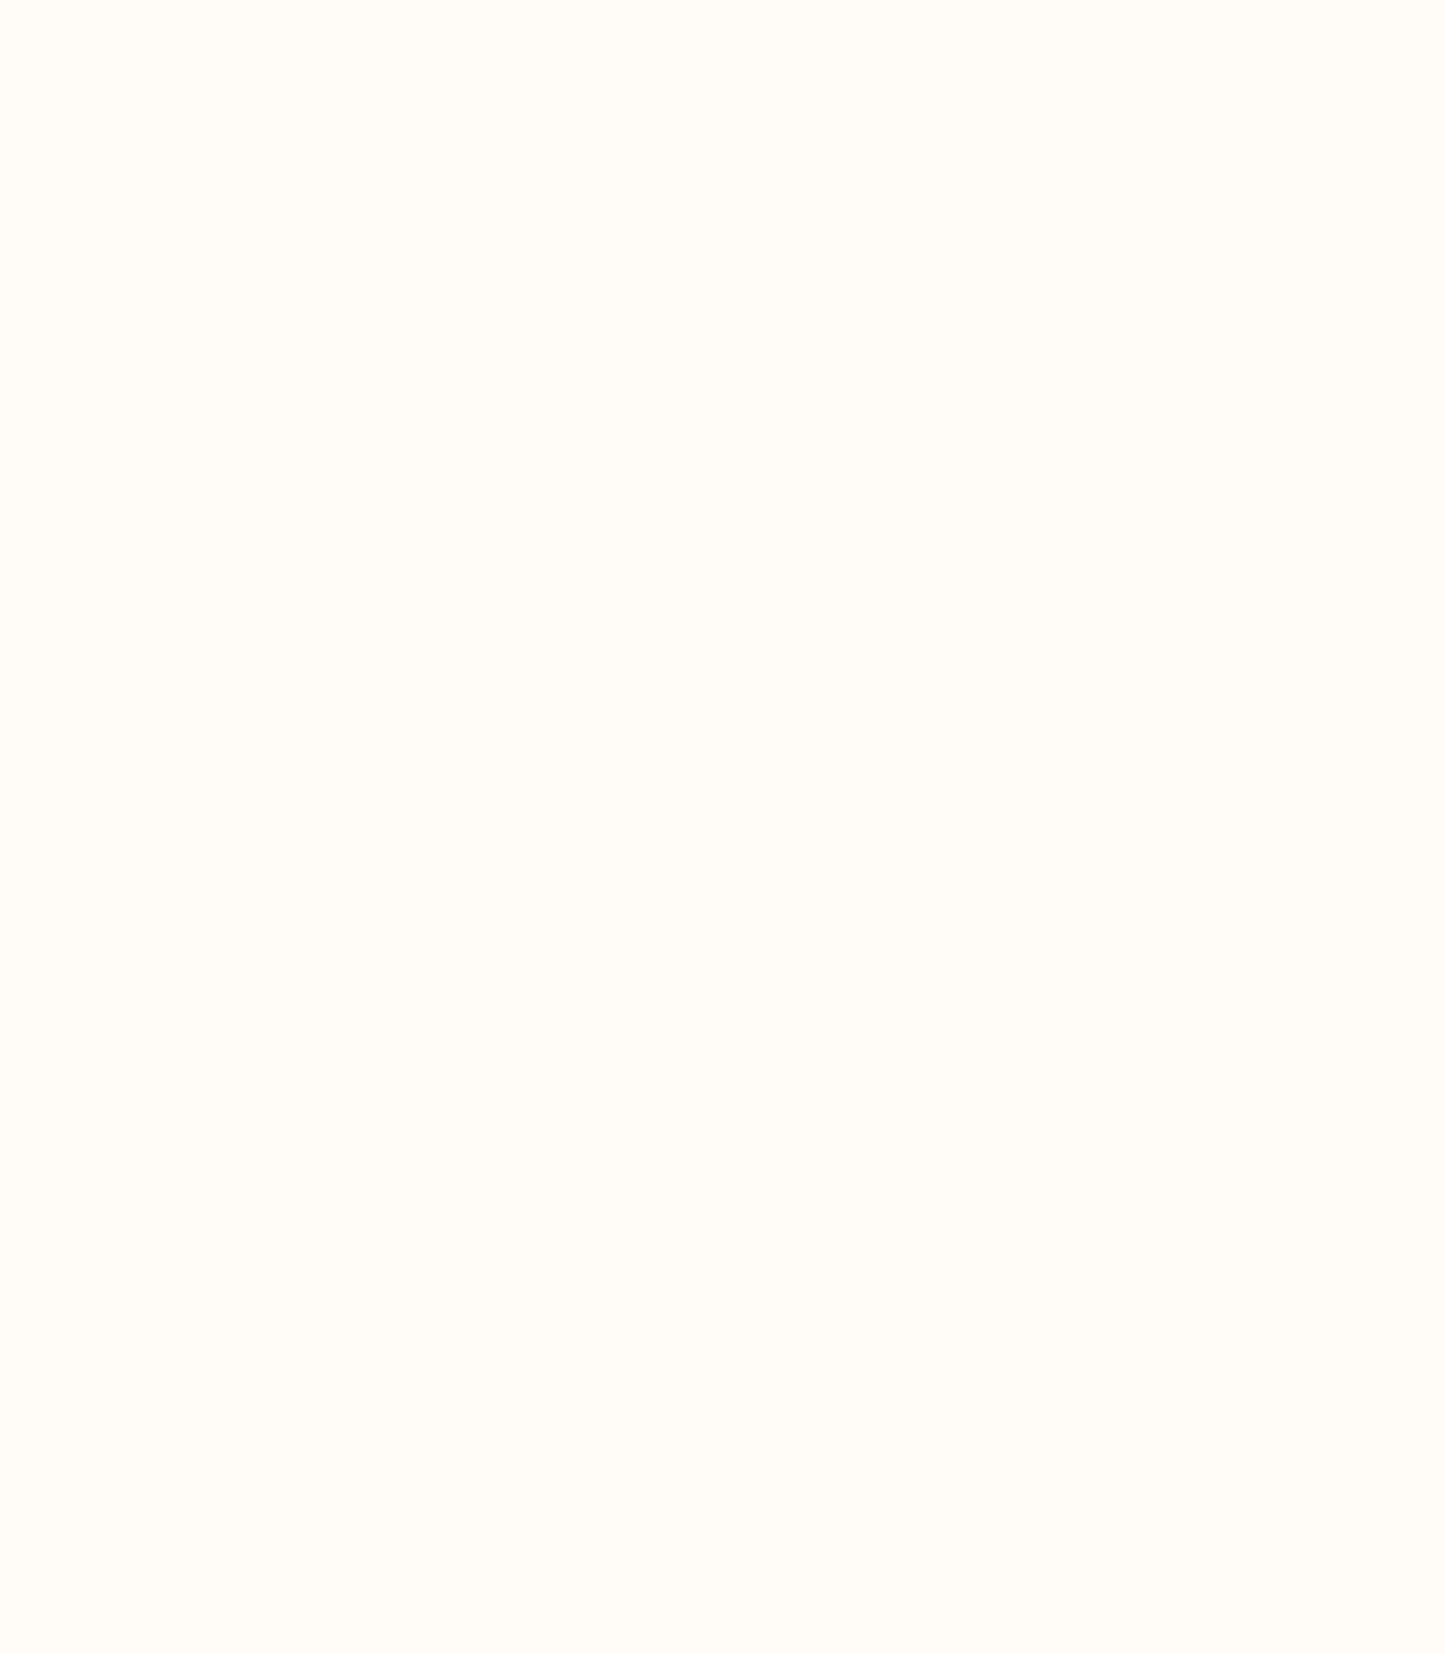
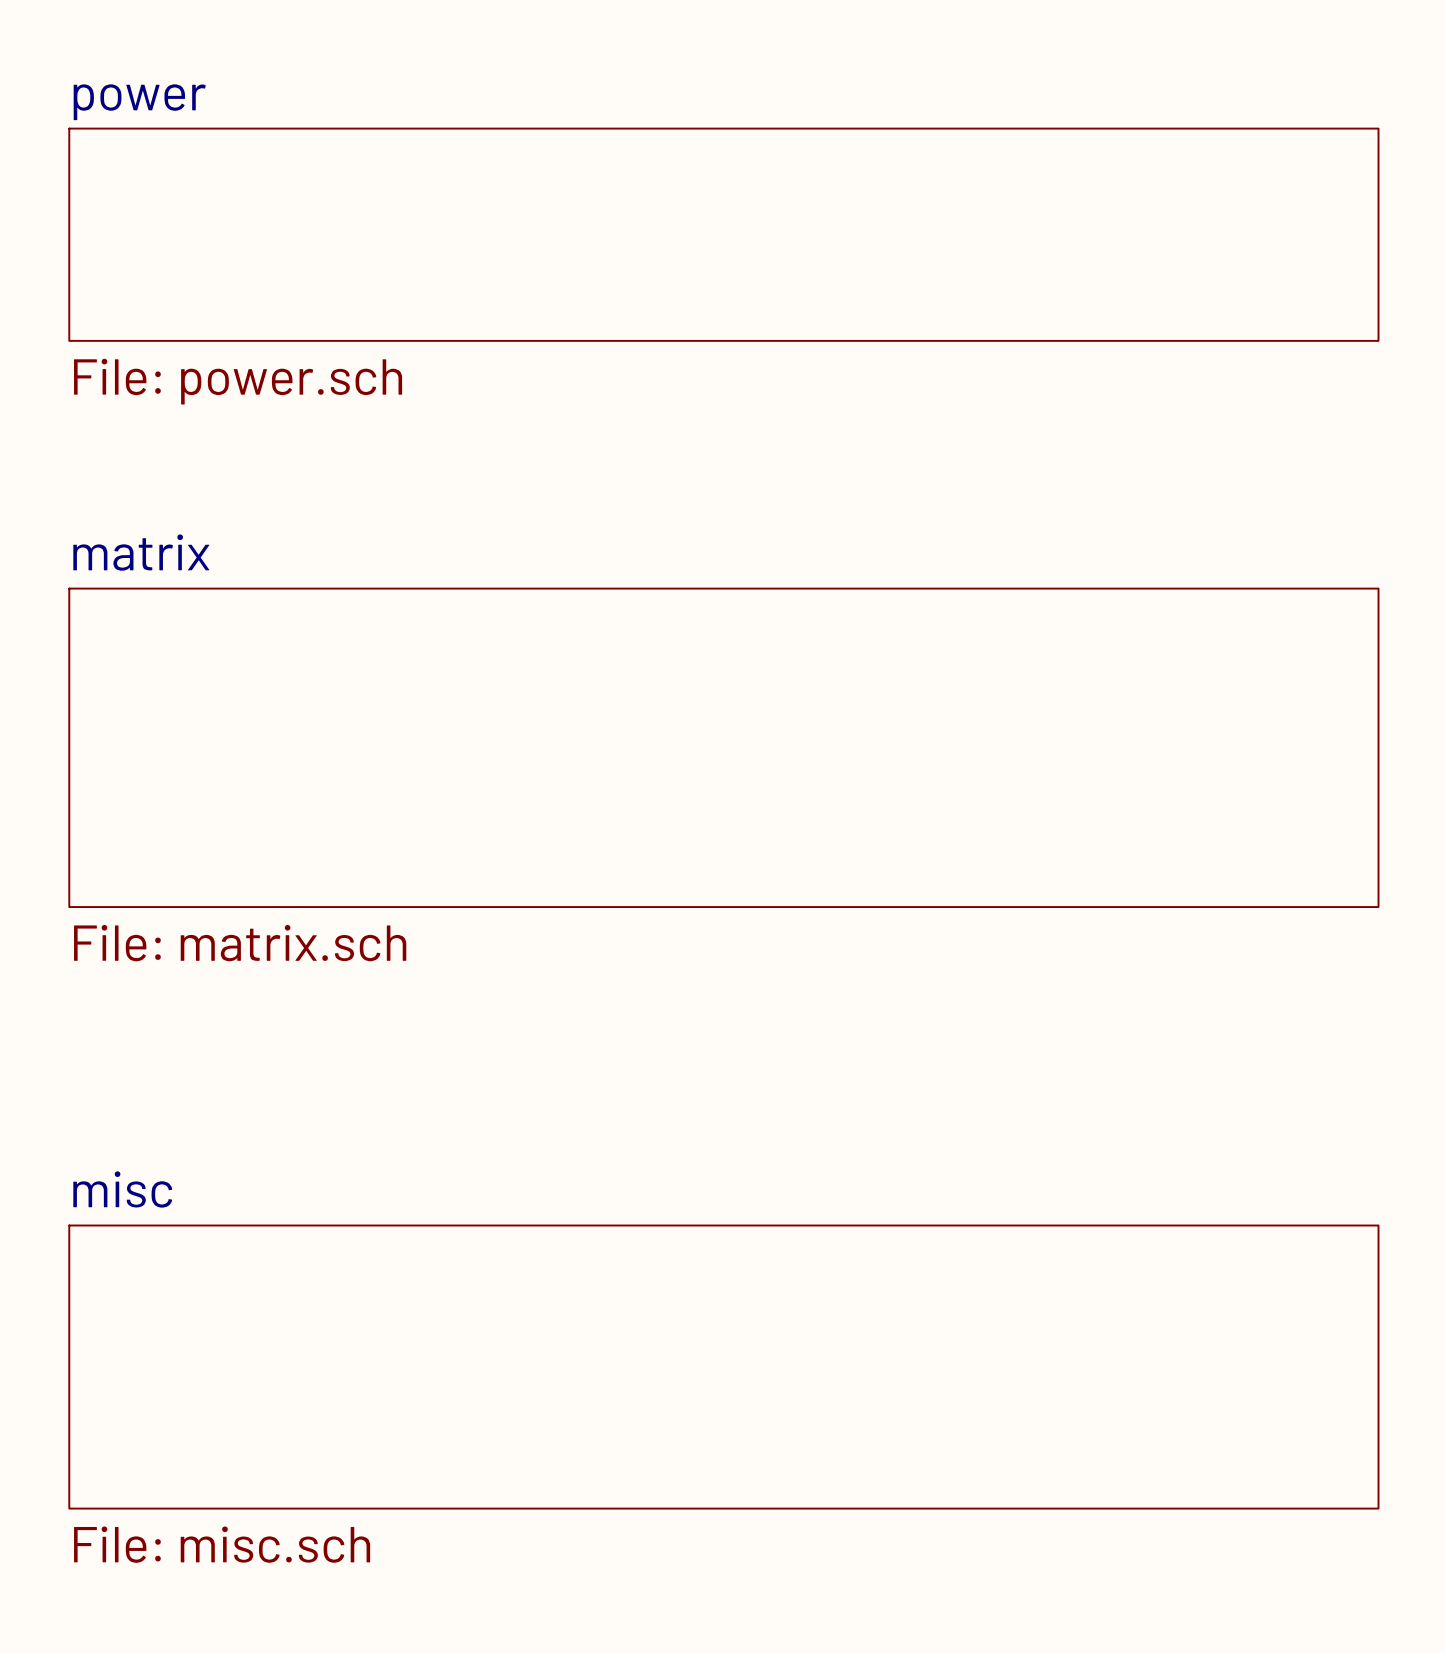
sheet power: none -> File: power.sch (723, 234)
sheet matrix: none -> File: matrix.sch (723, 747)
sheet misc: none -> File: misc.sch (723, 1367)

